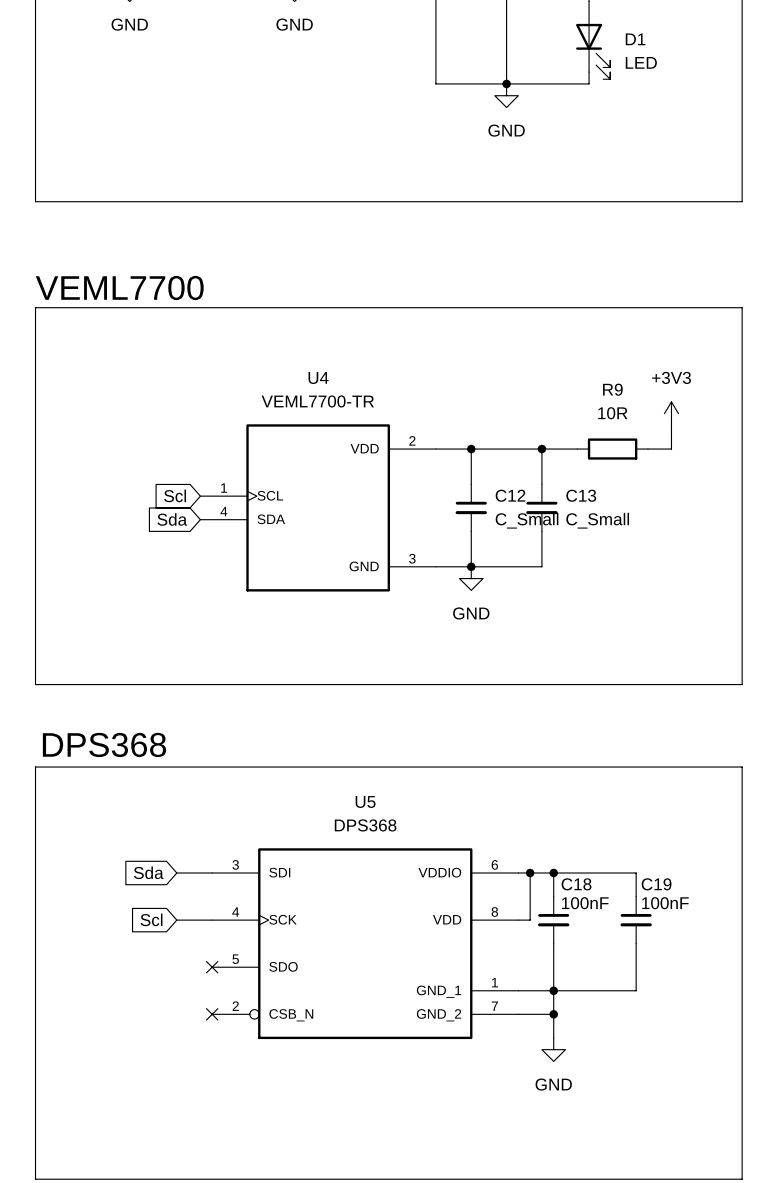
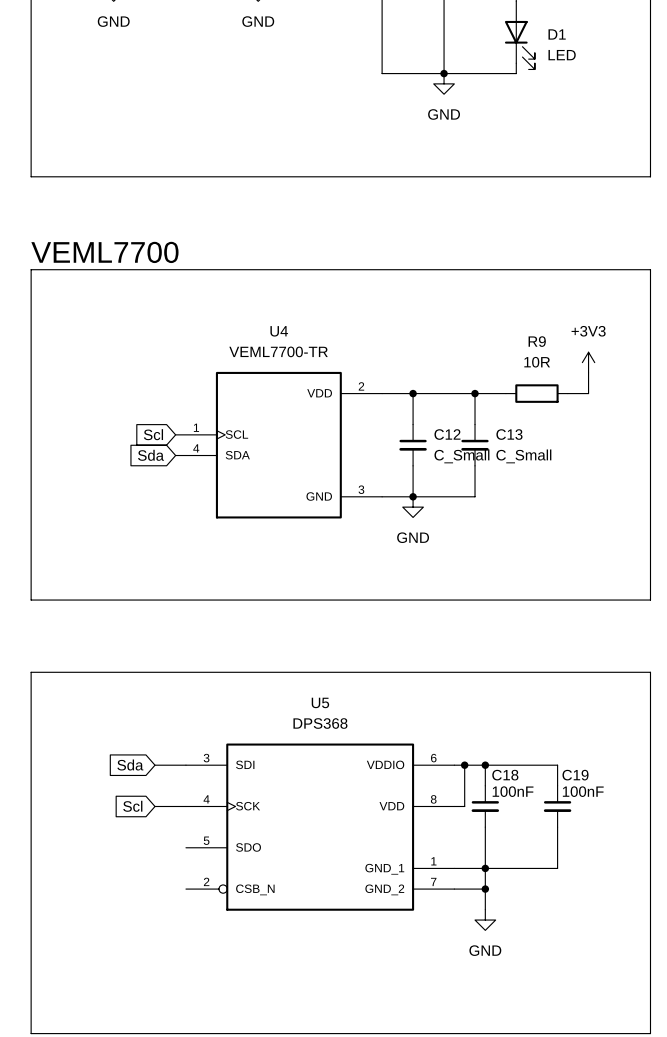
text: DPS368 (104, 744) -> none
no-connect mark: (212, 967) -> none
no-connect mark: (212, 1014) -> none

